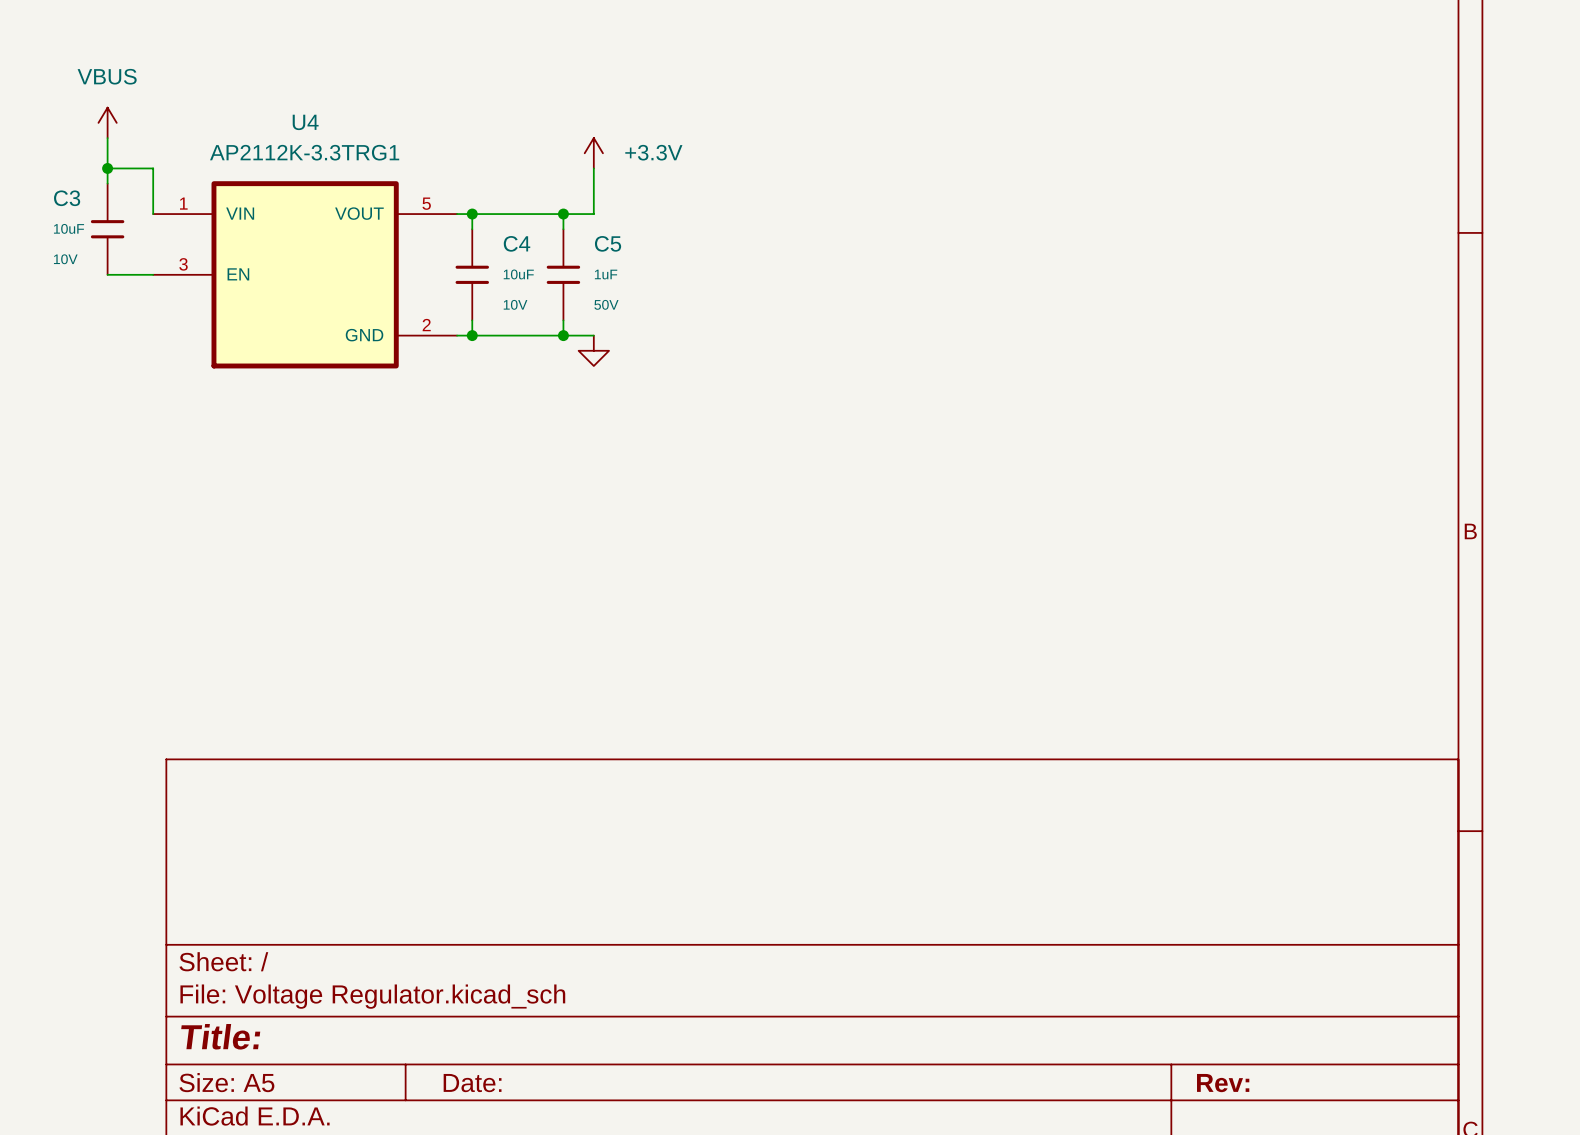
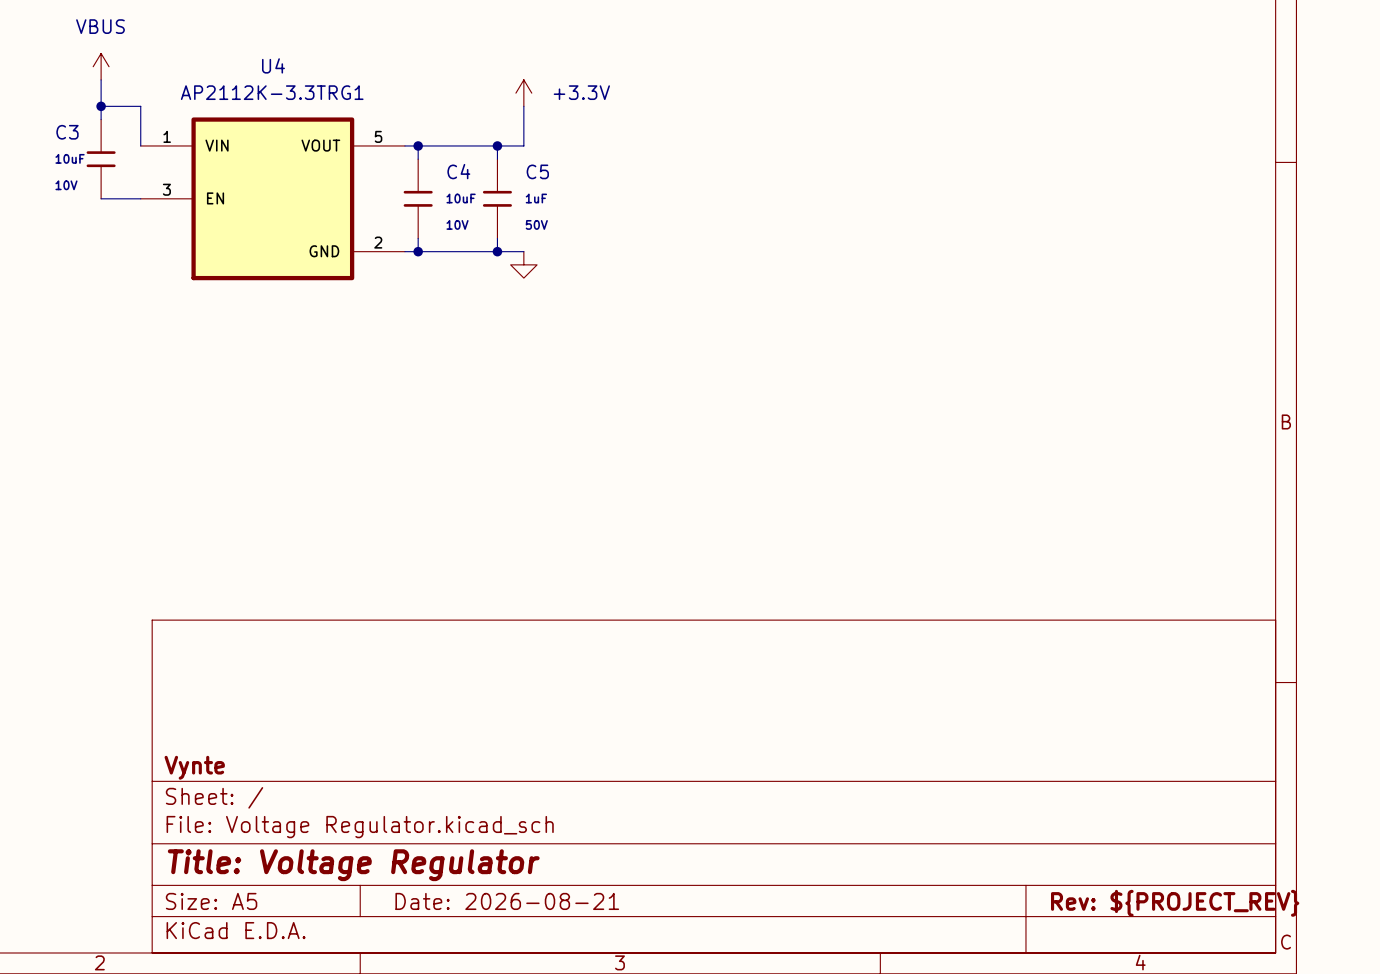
title block: none -> Vynte (194, 767)
title block: Title: (220, 1036) -> Title: Voltage Regulator (353, 865)
title block: Date: (472, 1083) -> Date: 2026-08-21 (507, 901)
title block: Rev: (1223, 1083) -> Rev: ${PROJECT_REV} (1175, 903)

